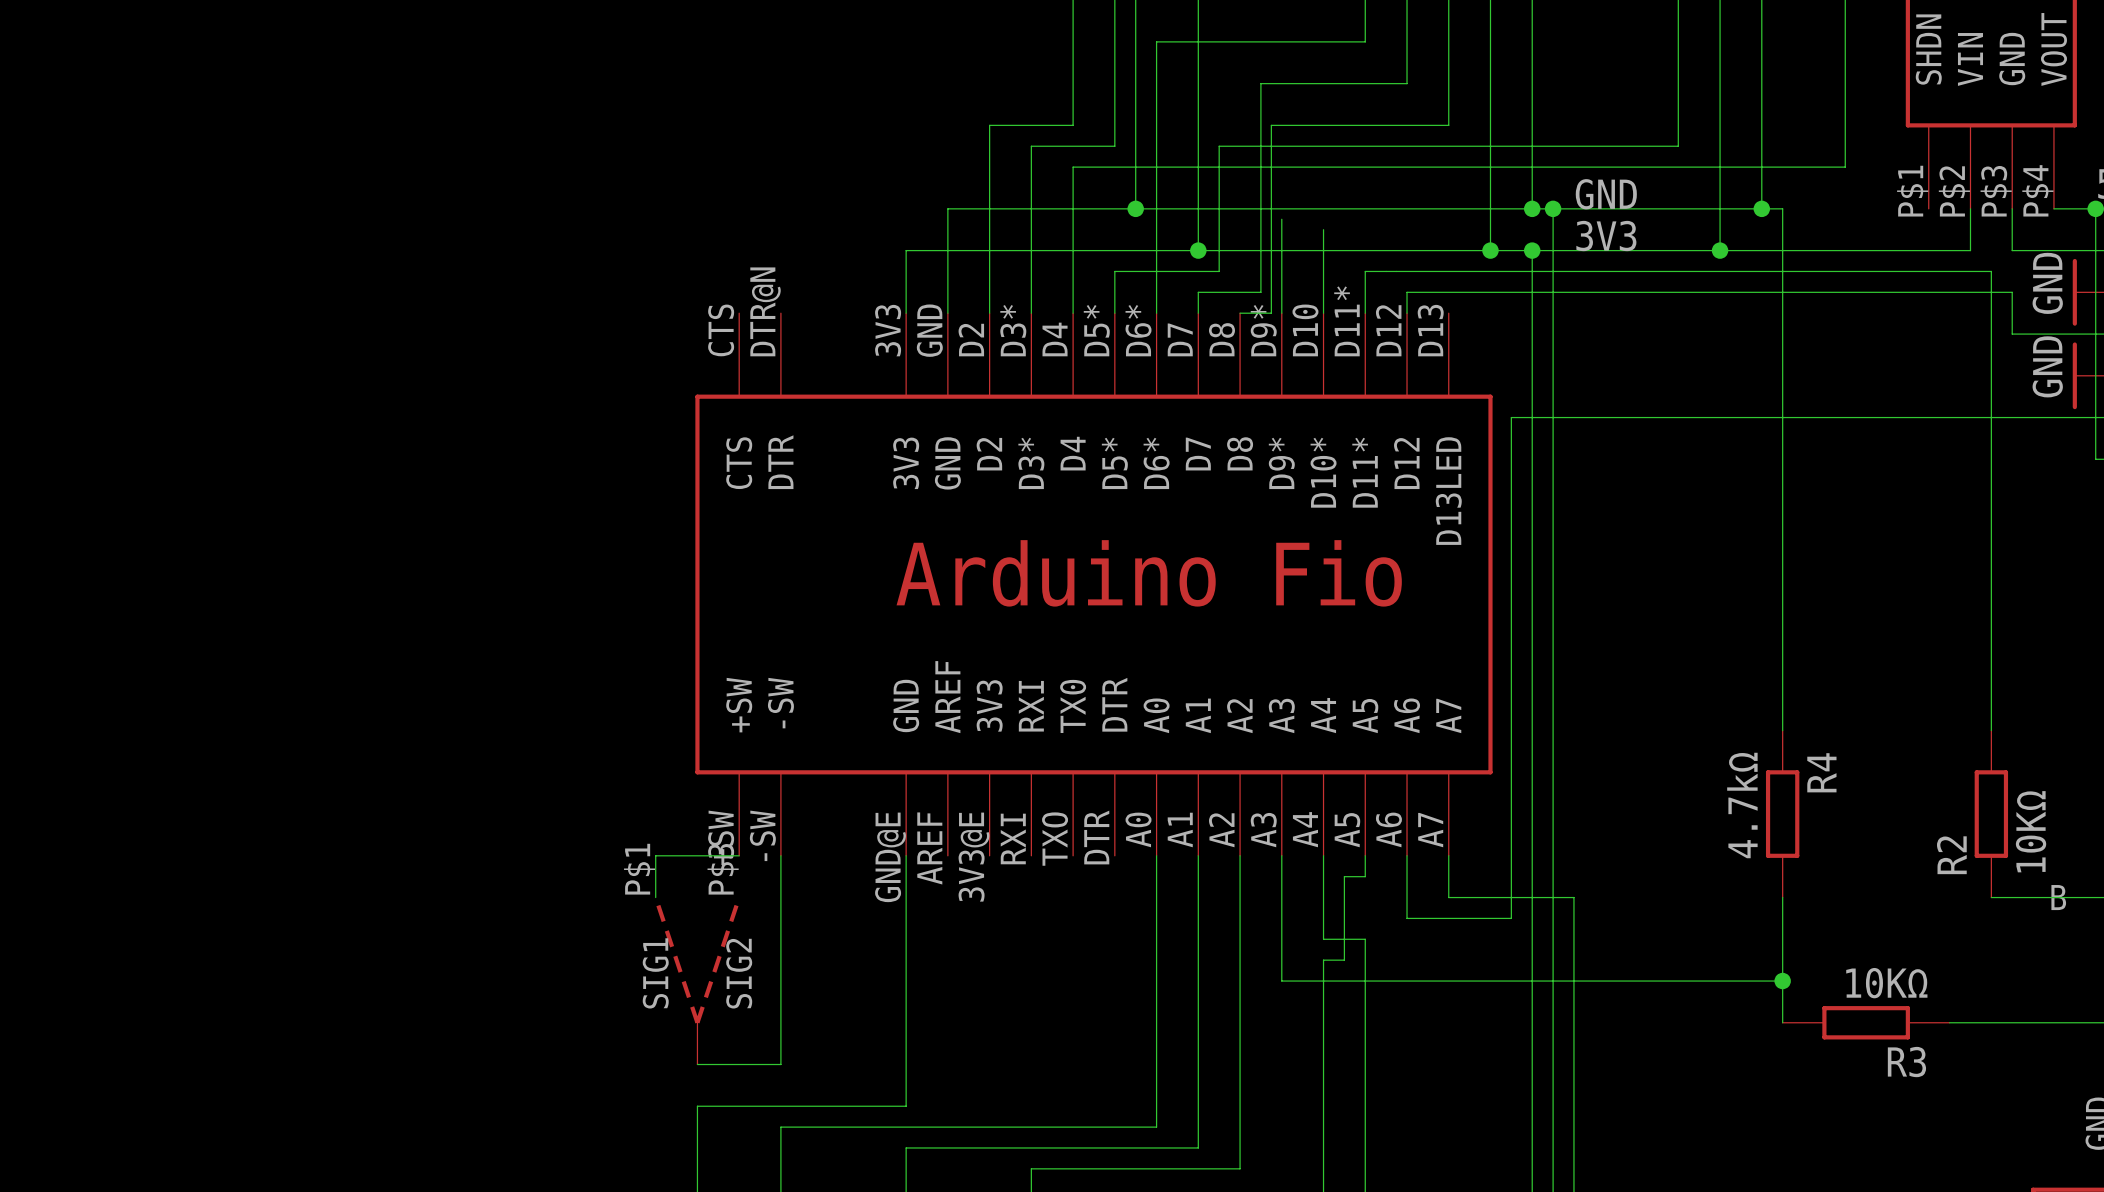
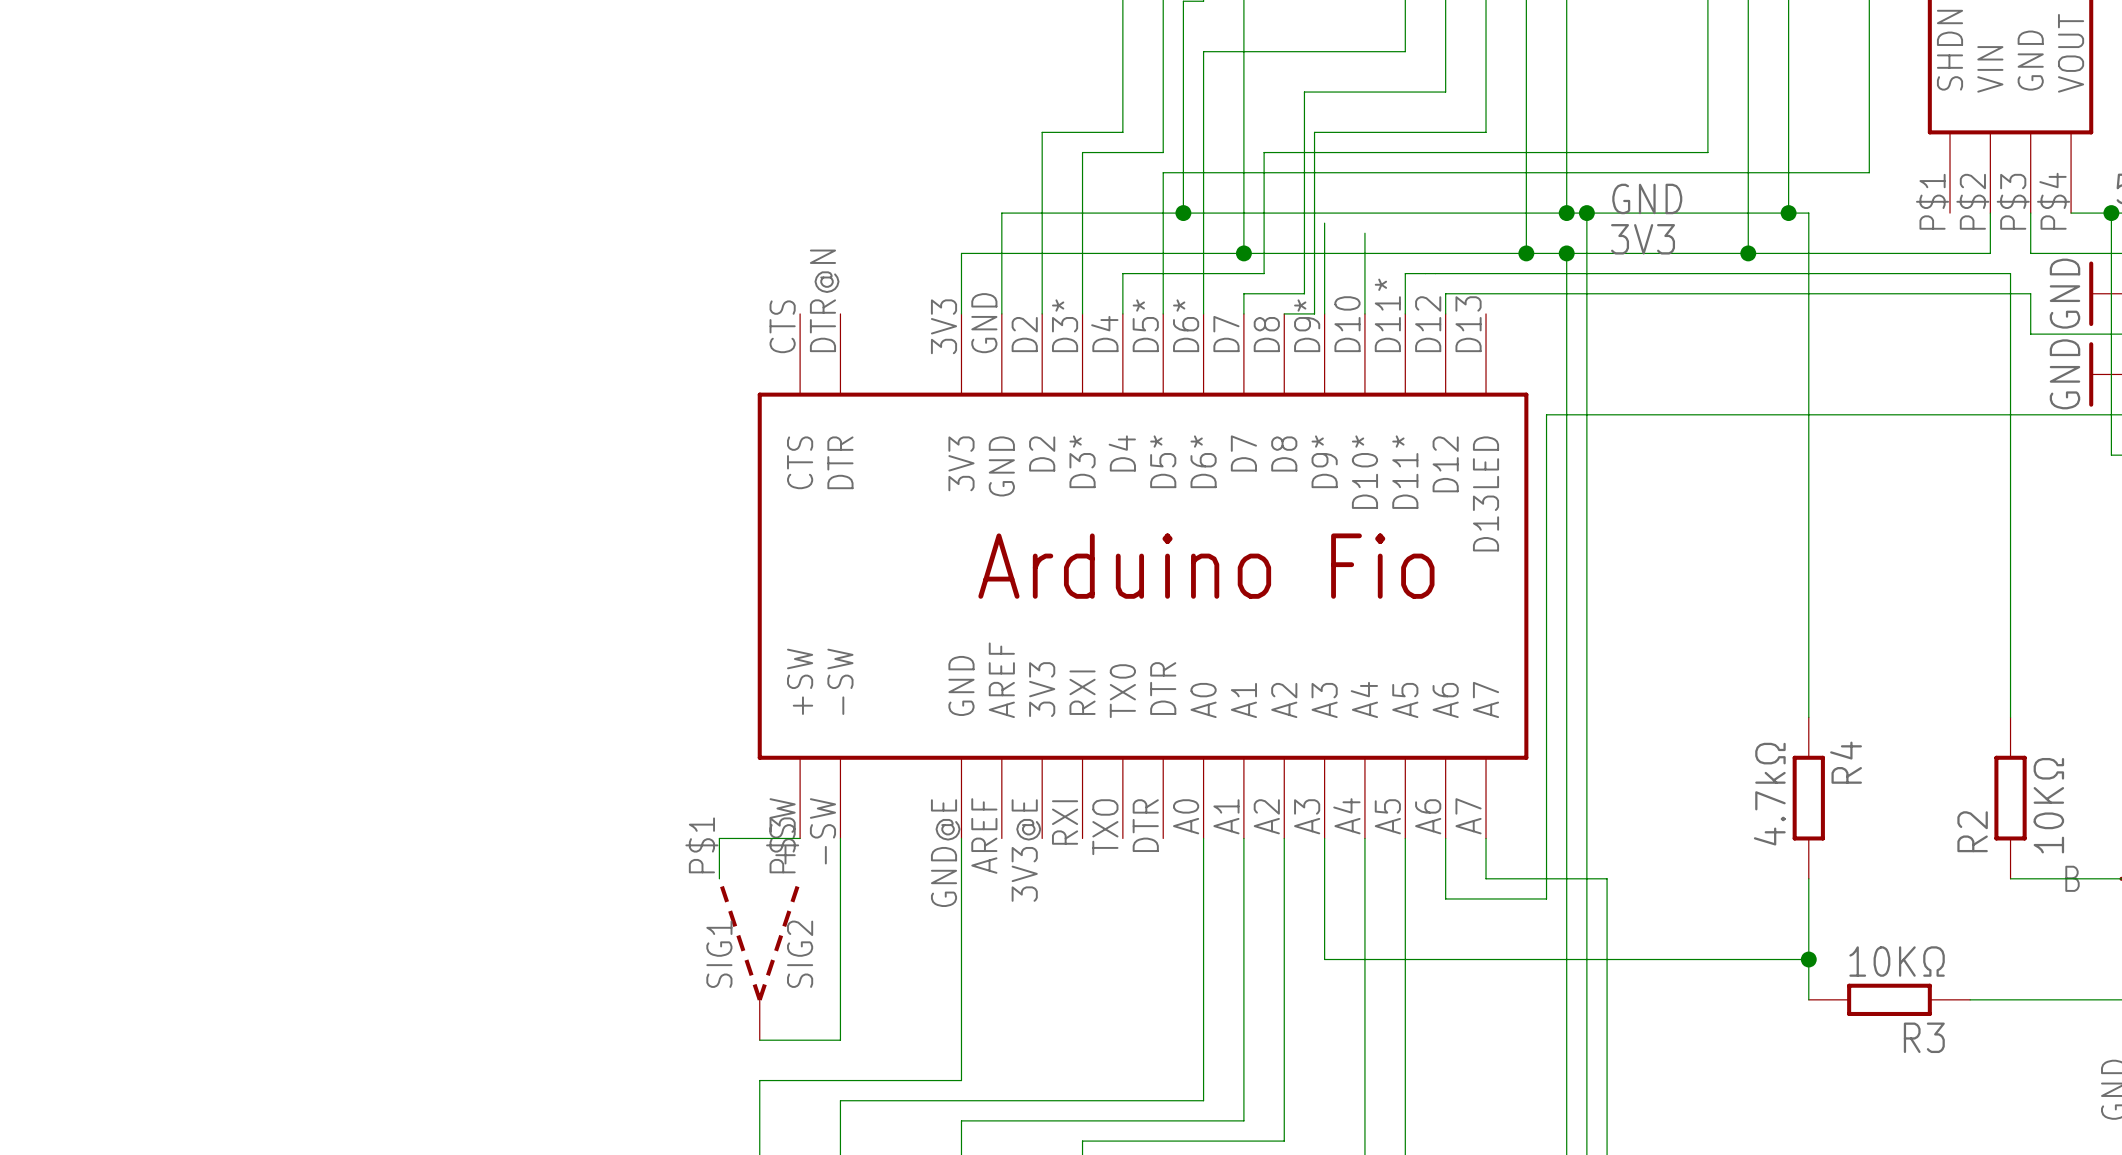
wire: (1114, 167) (1073, 167) (1073, 271) -> (1163, 172) (1163, 273) (1122, 273)
wire: (1365, 876) (1344, 876) (1344, 960) (1323, 960) -> (1405, 858) (1405, 919)
wire: (1323, 939) (1365, 939) -> (1364, 919) (1364, 939)

